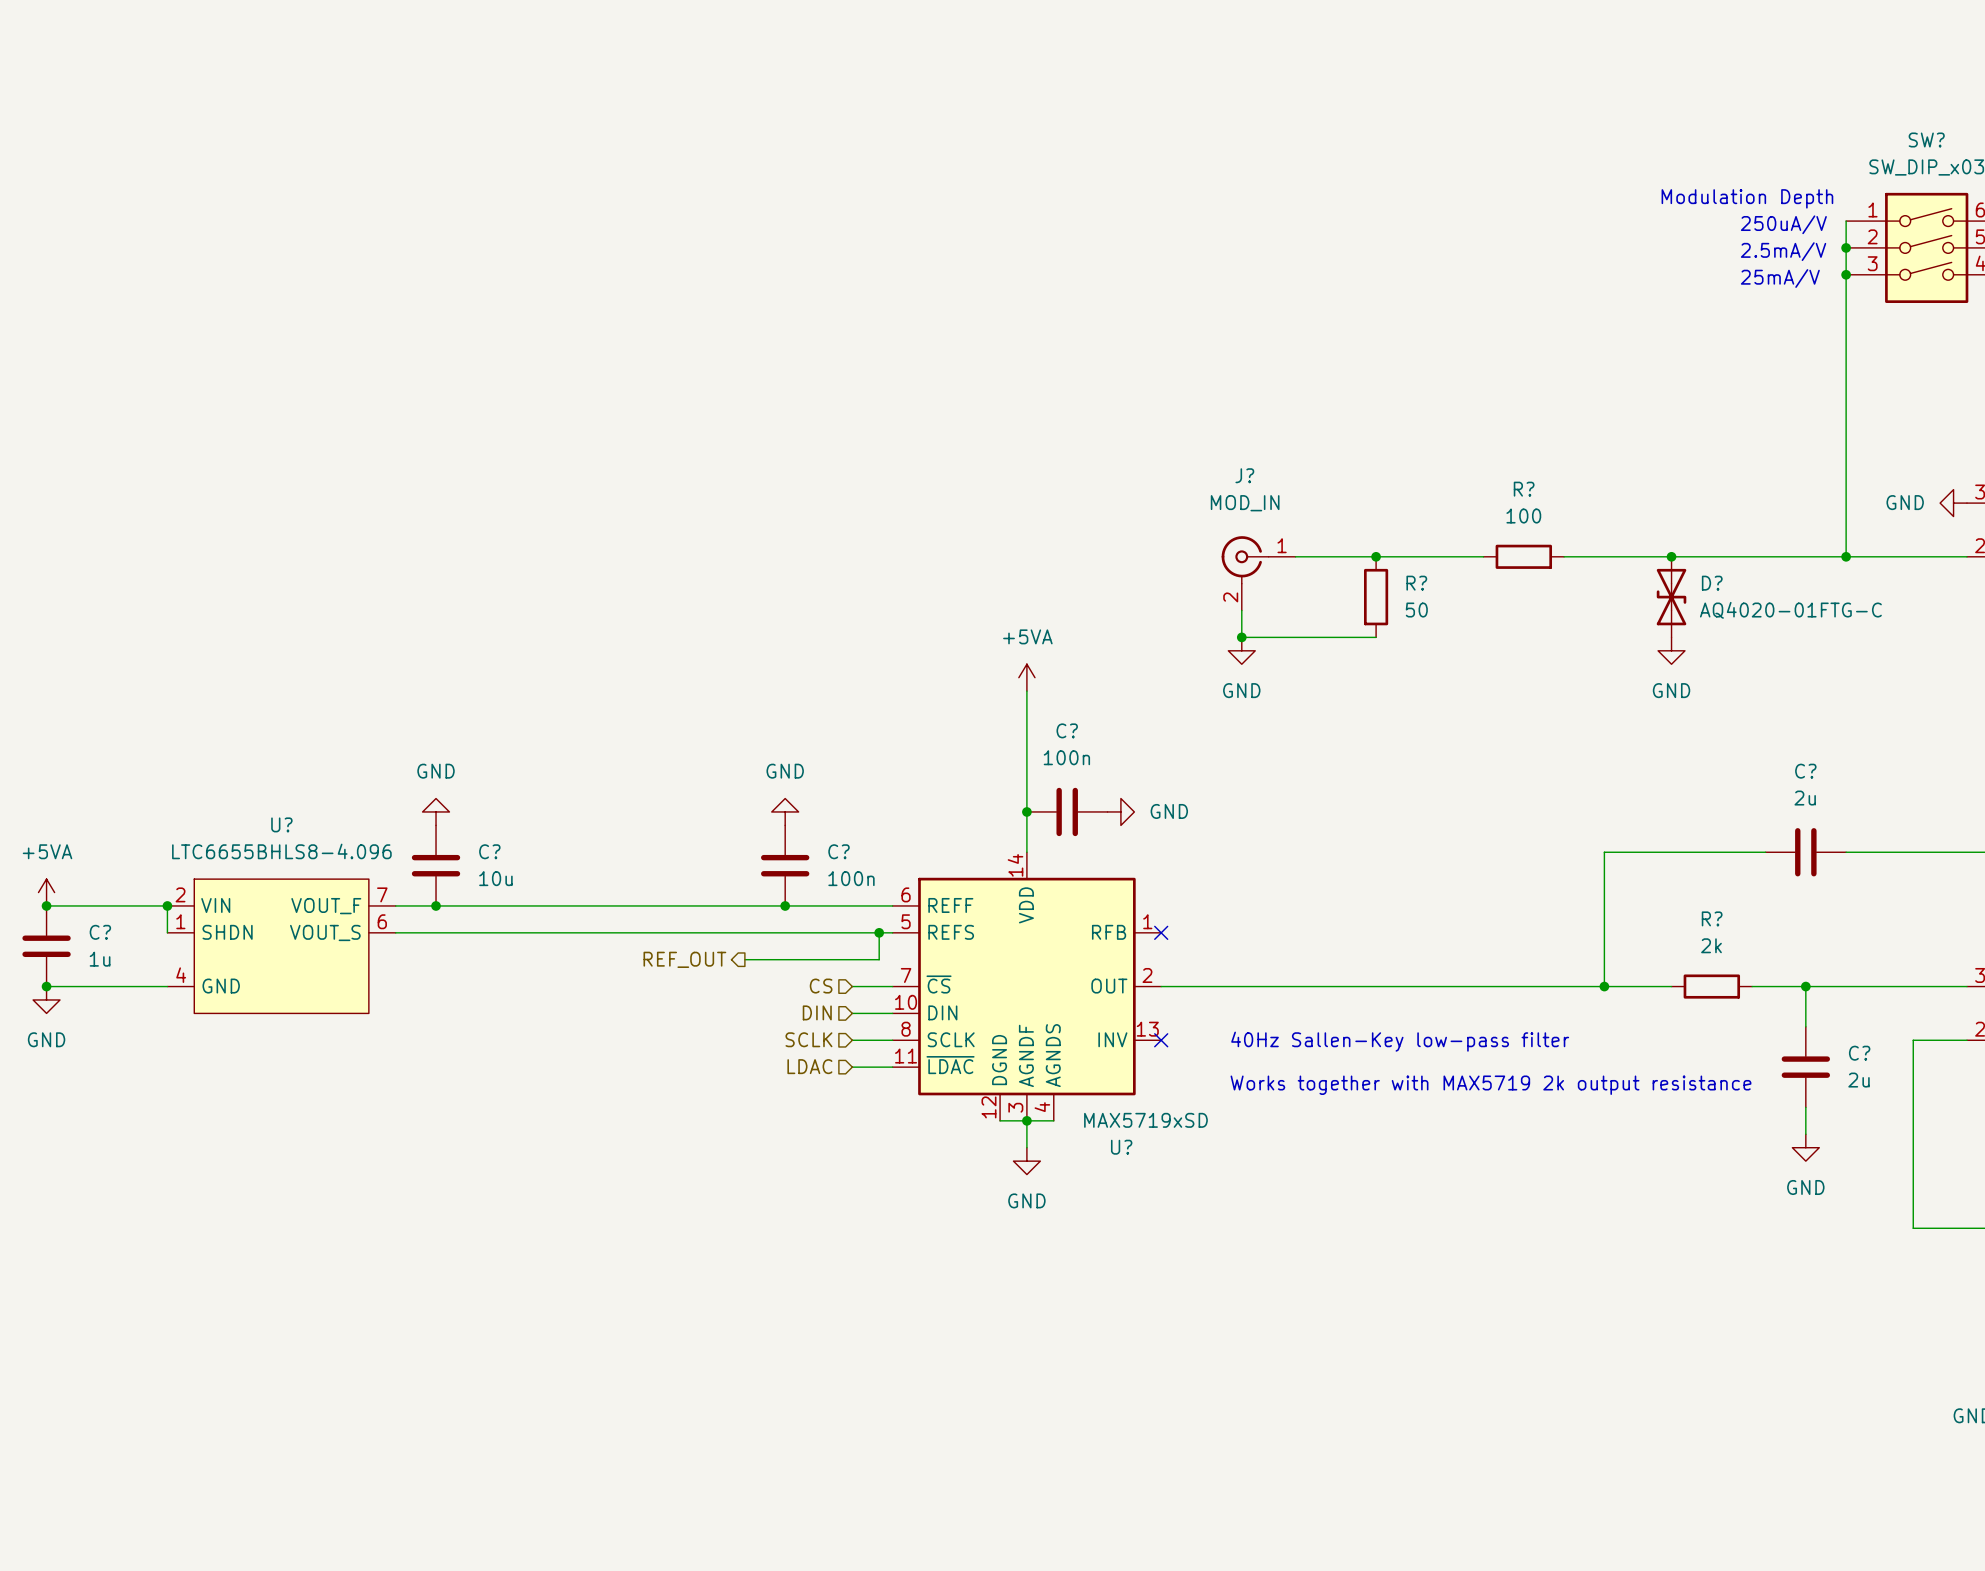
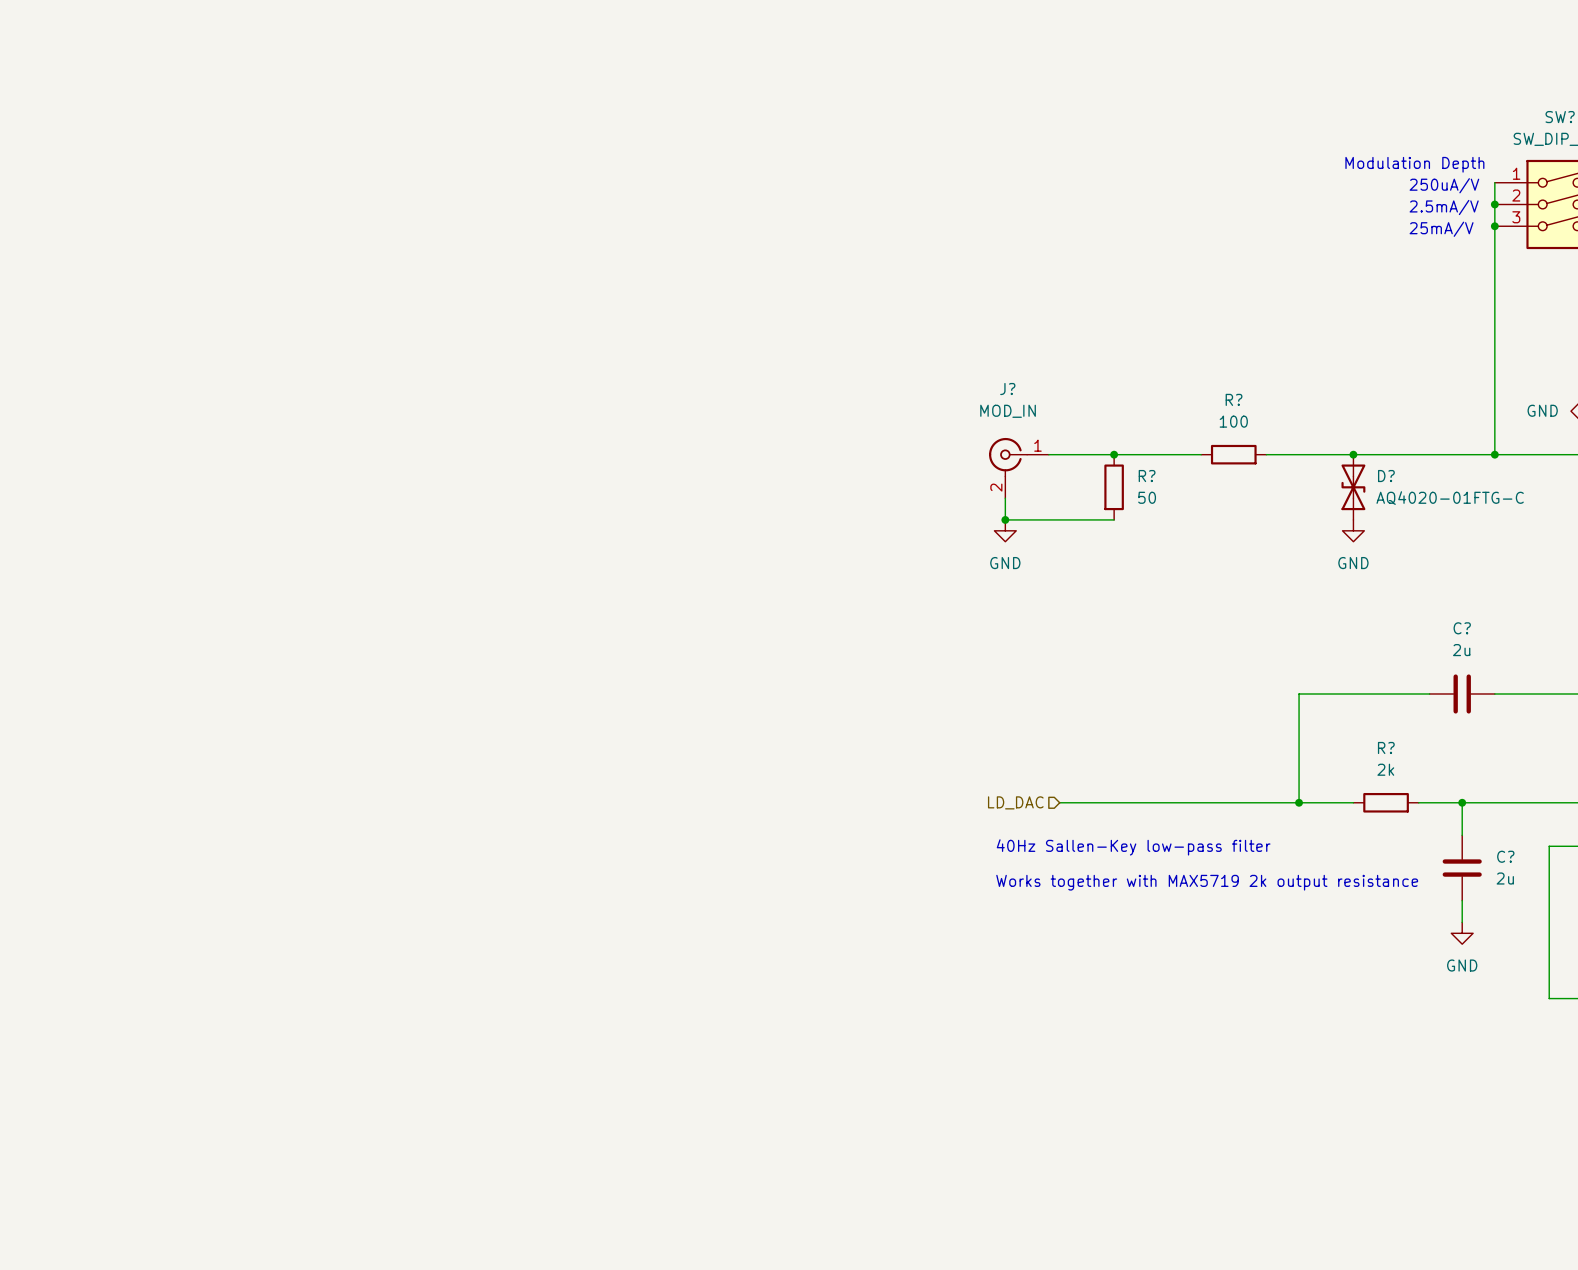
power symbol: +5VA (1026, 677) -> none
wire: (1026, 691) (1026, 852) -> none
power symbol: GND (436, 811) -> none
power symbol: GND (785, 811) -> none
junction: (1026, 811) -> none
C?: 100n (1067, 811) -> none
power symbol: GND (1120, 811) -> none
C?: 10u (436, 865) -> none
C?: 100n (785, 865) -> none
power symbol: +5VA (46, 892) -> none
wire: (46, 905) (167, 905) (167, 932) -> none
junction: (46, 905) -> none
junction: (167, 905) -> none
wire: (395, 905) (892, 905) -> none
junction: (436, 905) -> none
junction: (785, 905) -> none
wire: (395, 932) (892, 932) -> none
wire: (879, 932) (879, 959) (744, 959) -> none
junction: (879, 932) -> none
no-connect mark: (1161, 932) -> none
C?: 1u (46, 946) -> none
U?: LTC6655BHLS8-4.096 (281, 946) -> none
hierarchical label: REF_OUT (684, 959) -> none
wire: (46, 986) (167, 986) -> none
junction: (46, 986) -> none
hierarchical label: CS (821, 986) -> none
wire: (852, 986) (892, 986) -> none
U?: MAX5719xSD (1026, 986) -> none
wire: (1161, 986) (1308, 986) -> none
hierarchical label: none -> LD_DAC (1015, 802)
power symbol: GND (46, 999) -> none
hierarchical label: DIN (817, 1012) -> none
wire: (852, 1013) (892, 1013) -> none
hierarchical label: SCLK (808, 1039) -> none
wire: (852, 1040) (892, 1040) -> none
no-connect mark: (1161, 1040) -> none
hierarchical label: LDAC (809, 1066) -> none
wire: (852, 1067) (892, 1067) -> none
wire: (1000, 1120) (1053, 1120) -> none
wire: (1026, 1120) (1026, 1147) -> none
junction: (1026, 1120) -> none
power symbol: GND (1026, 1161) -> none

